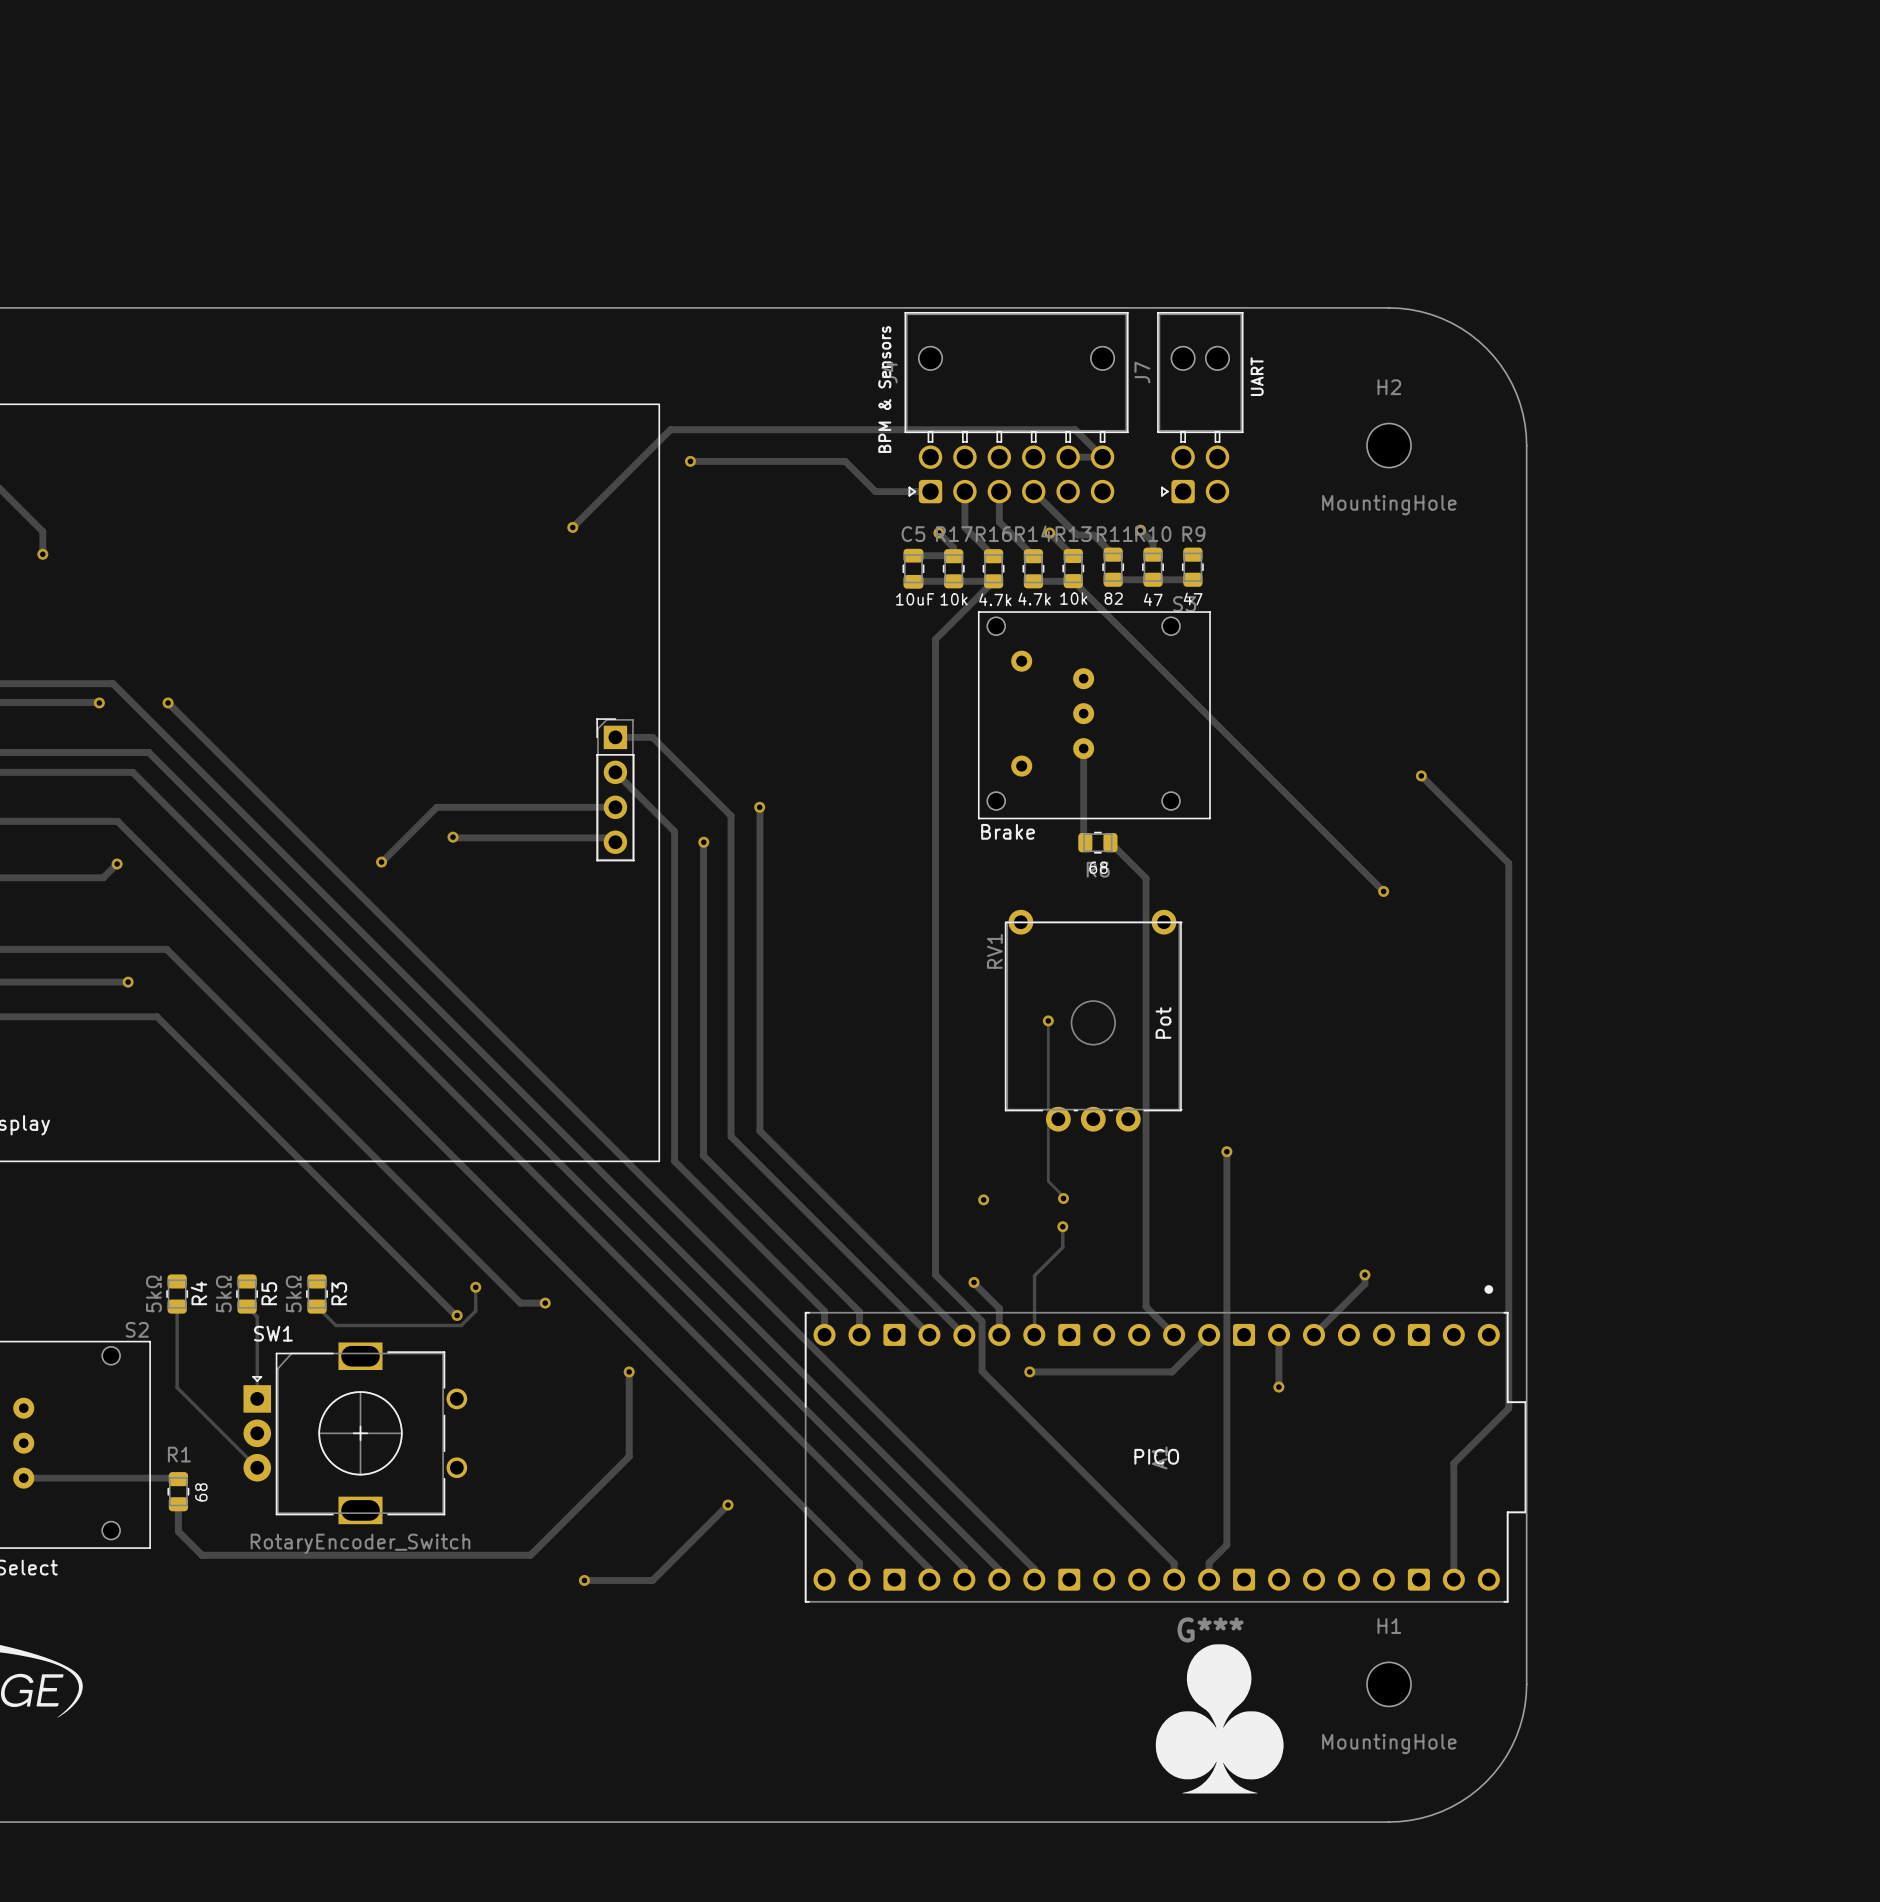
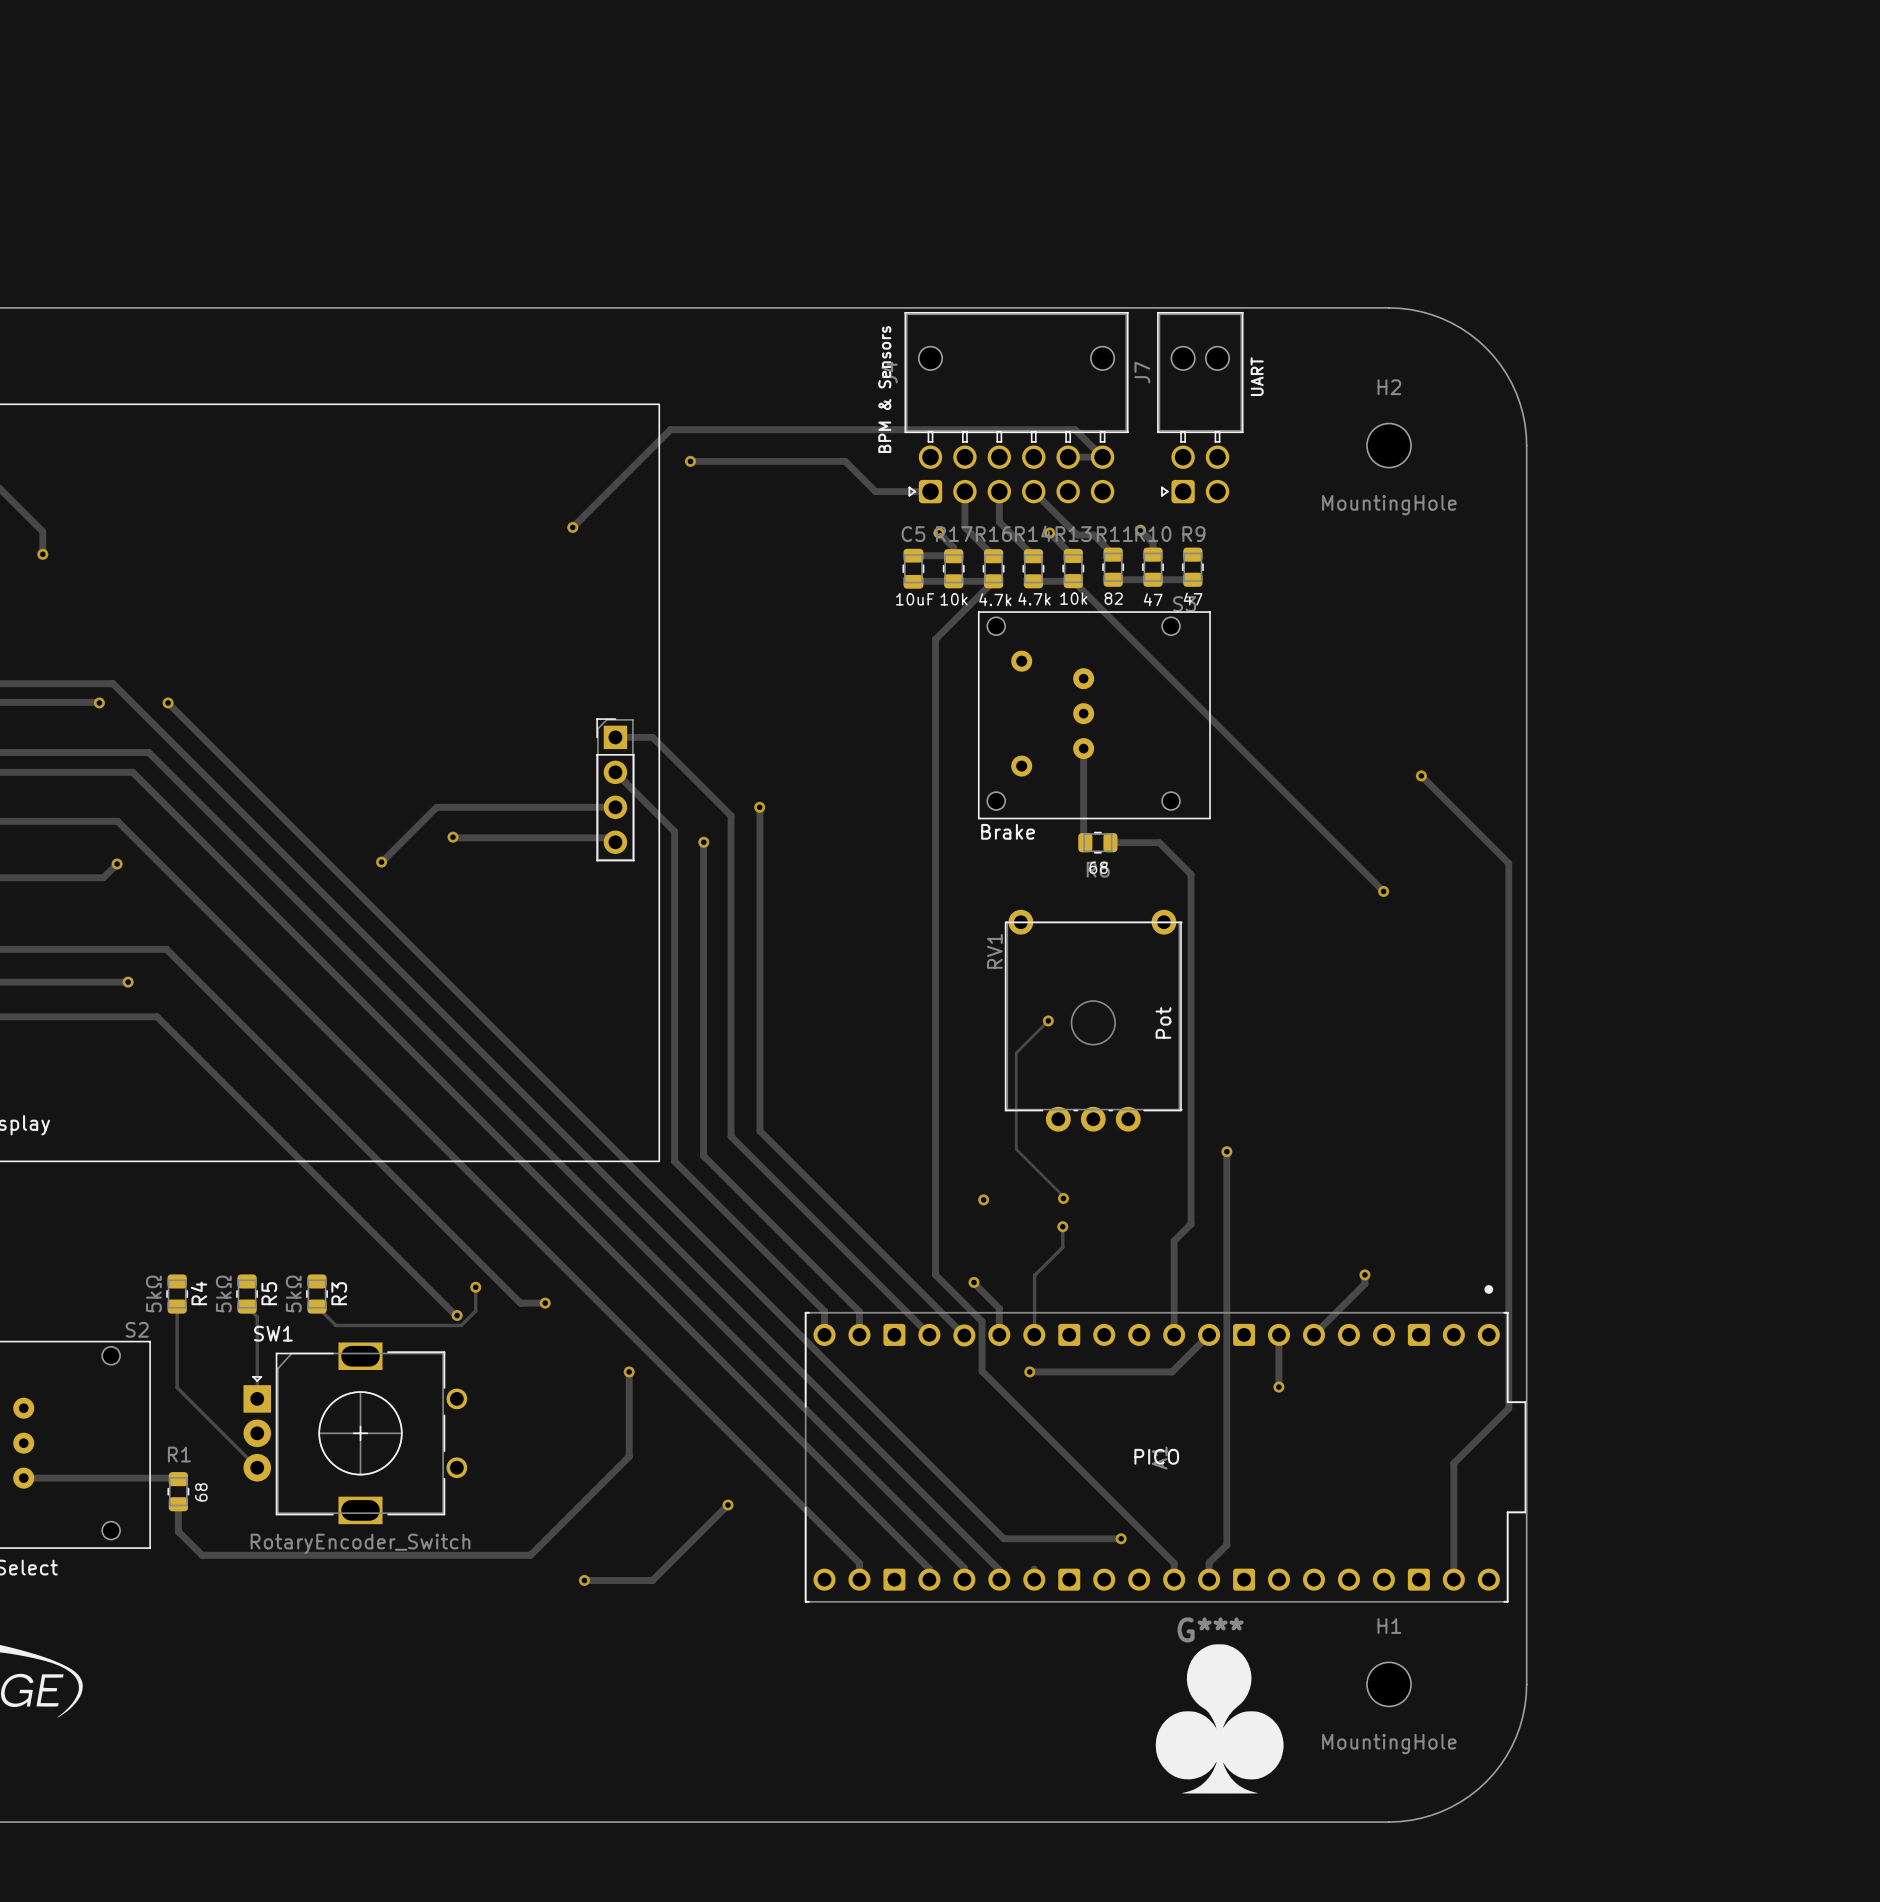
track: (168, 702) (1034, 1569) -> (168, 702) (1003, 1538) (1121, 1538)
track: (1110, 842) (1146, 878) (1146, 1306) (1174, 1334) -> (1110, 842) (1159, 842) (1191, 874) (1191, 1224) (1174, 1241) (1174, 1334)
track: (1048, 1020) (1048, 1181) -> (1048, 1020) (1016, 1053) (1016, 1149) (1048, 1181)
via: none -> (1121, 1538)

